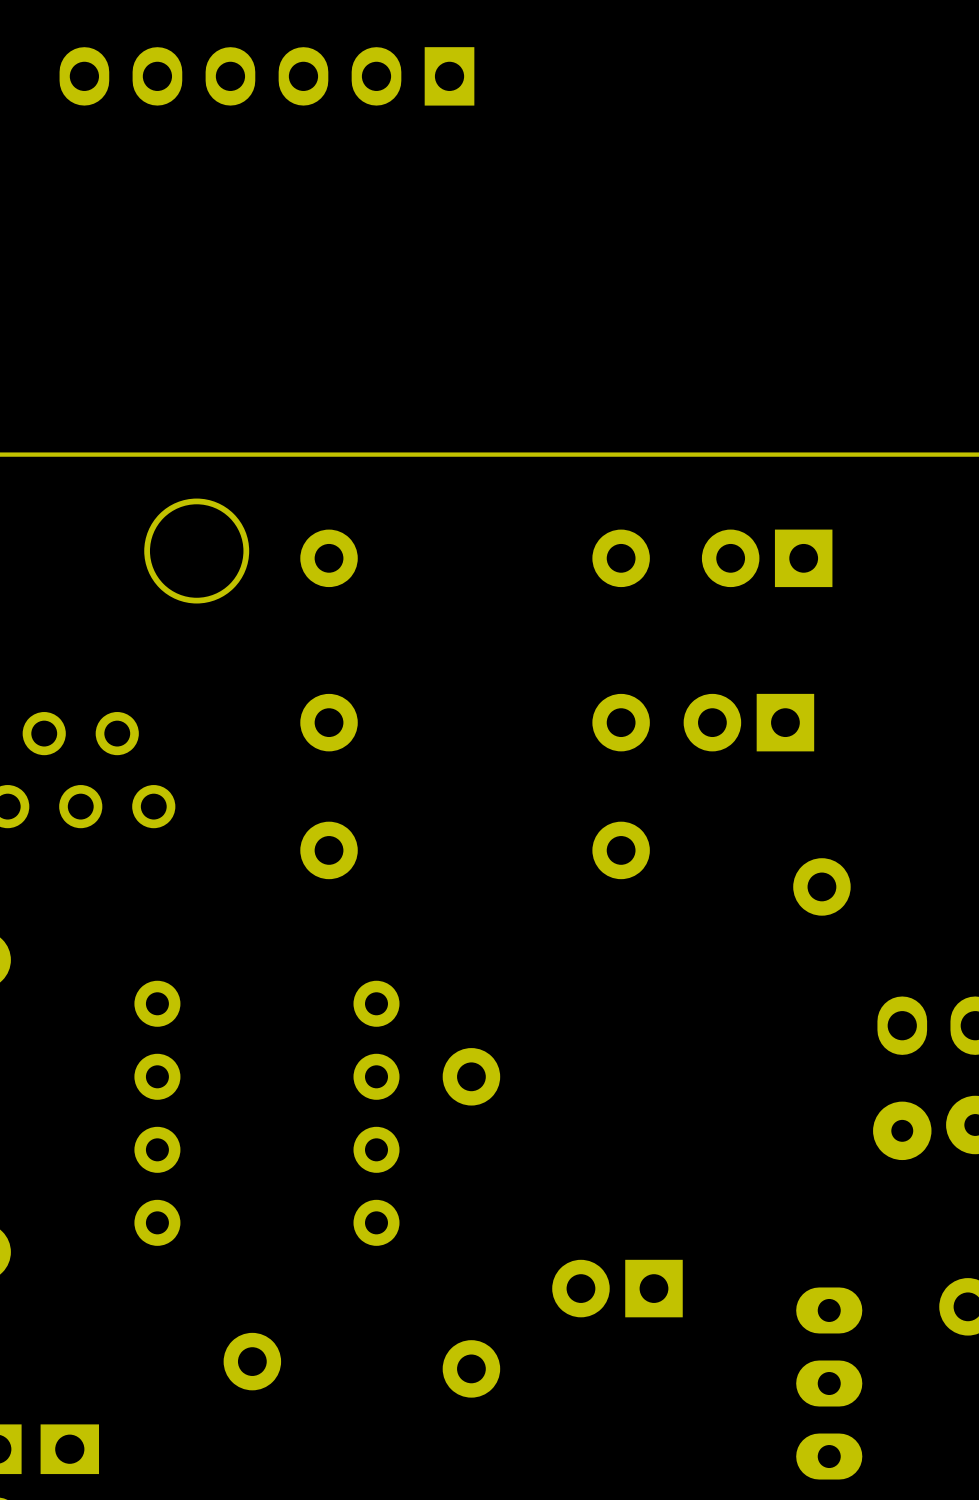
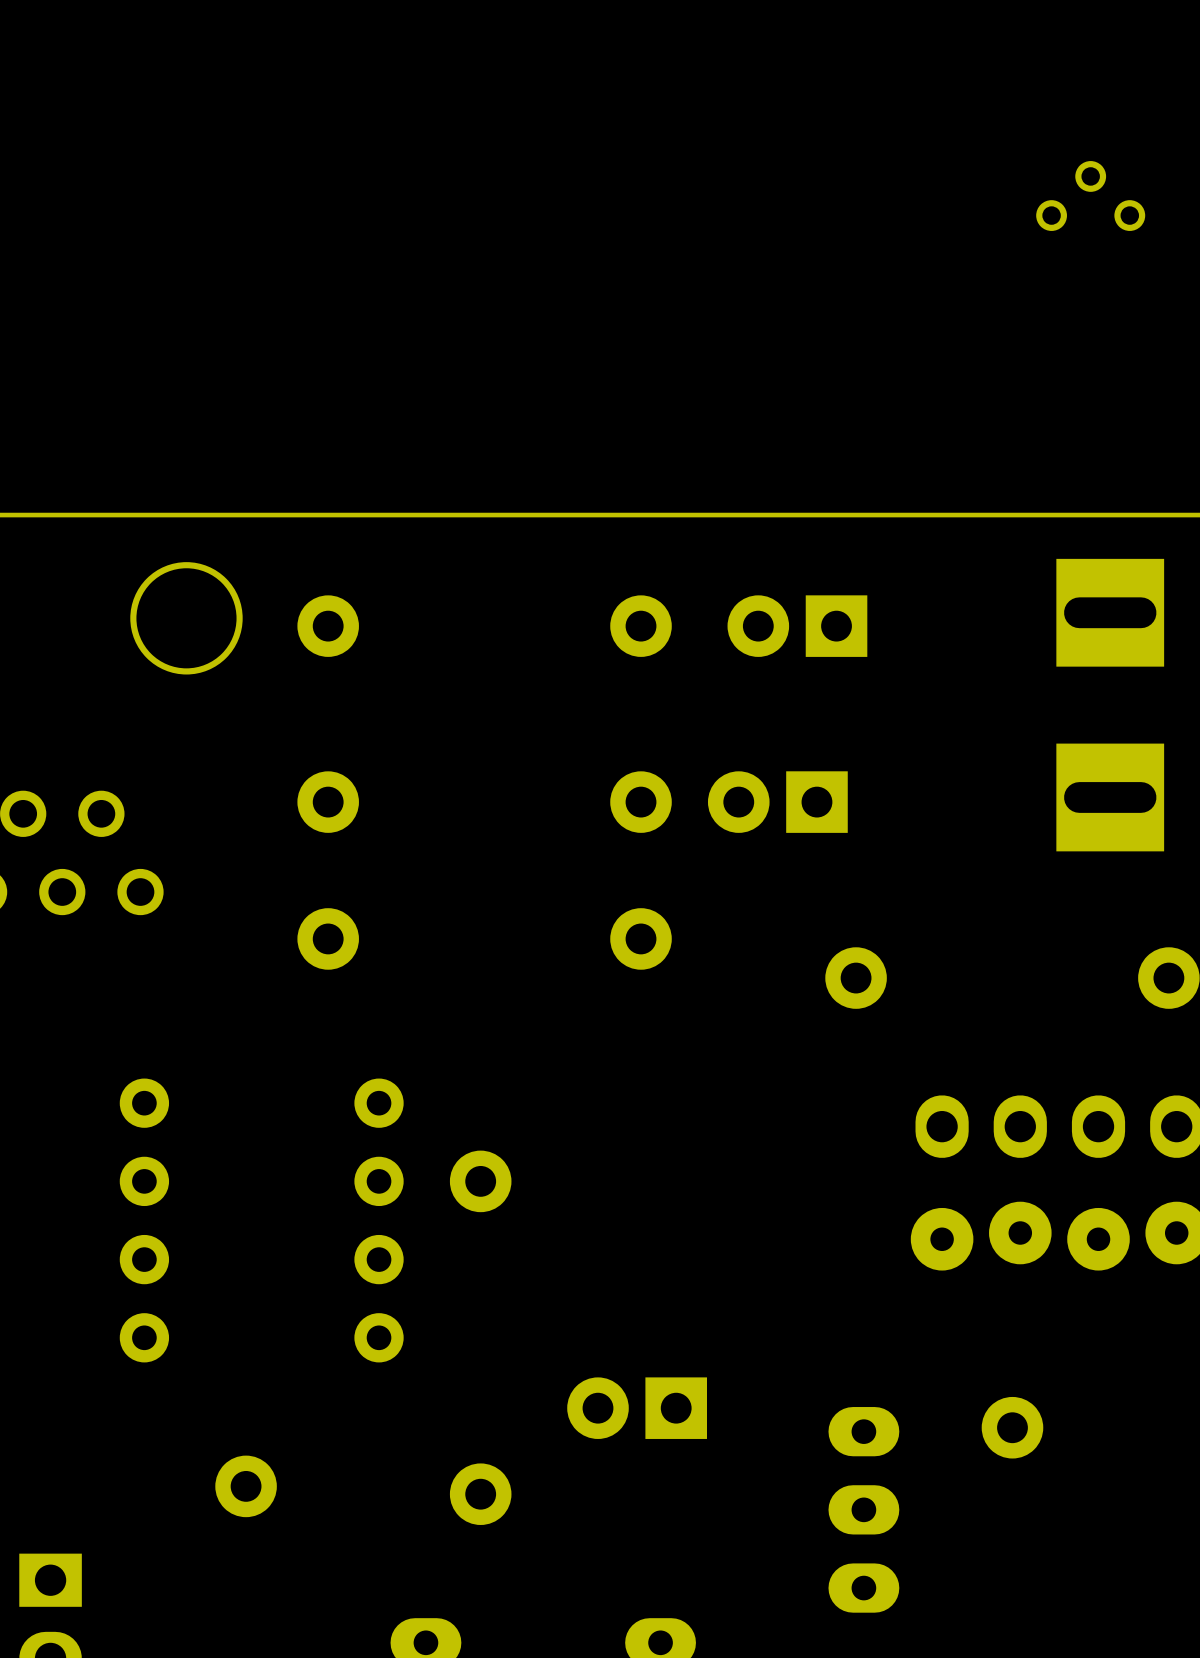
part: (266, 76) -> none

